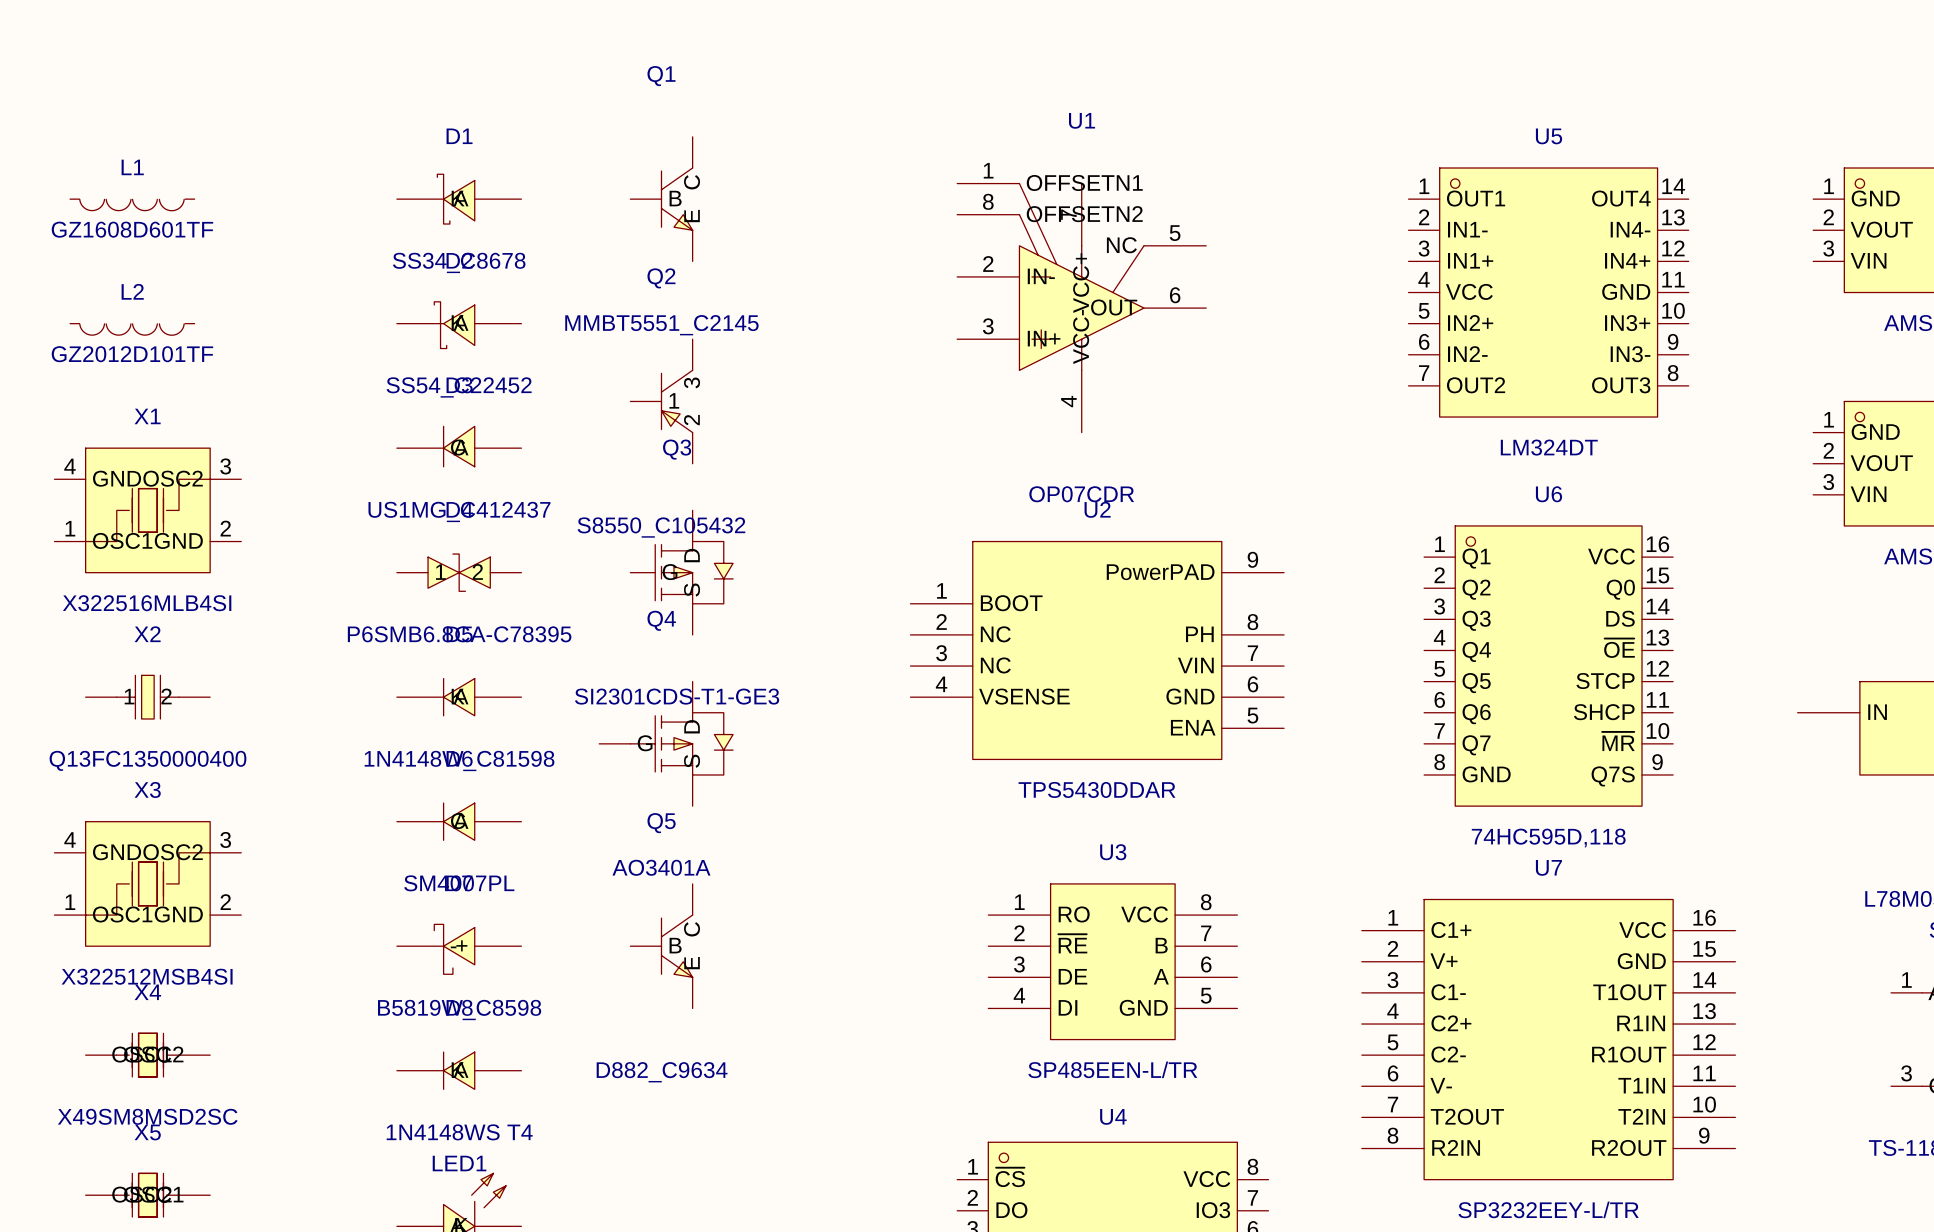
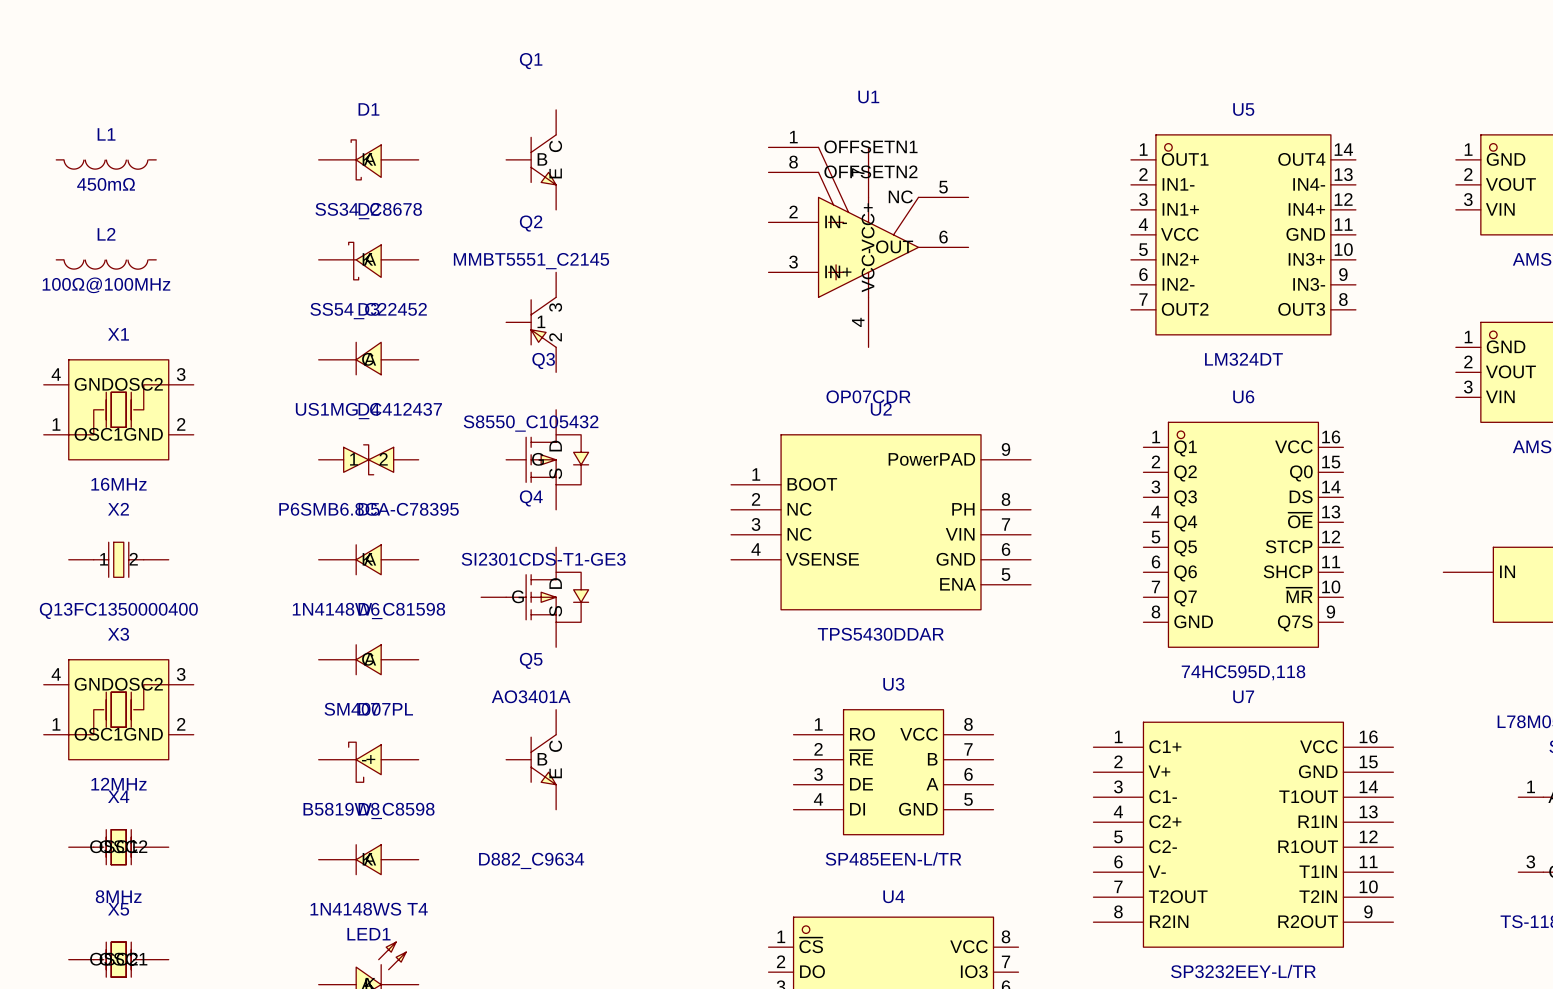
L1 value: GZ1608D601TF (132, 229) -> 450mΩ (106, 184)
L2 value: GZ2012D101TF (132, 354) -> 100Ω@100MHz (106, 285)
X1 value: X322516MLB4SI (147, 603) -> 16MHz (118, 484)
X3 value: X322512MSB4SI (147, 976) -> 12MHz (118, 784)
X4 value: X49SM8MSD2SC (147, 1116) -> 8MHz (118, 896)

